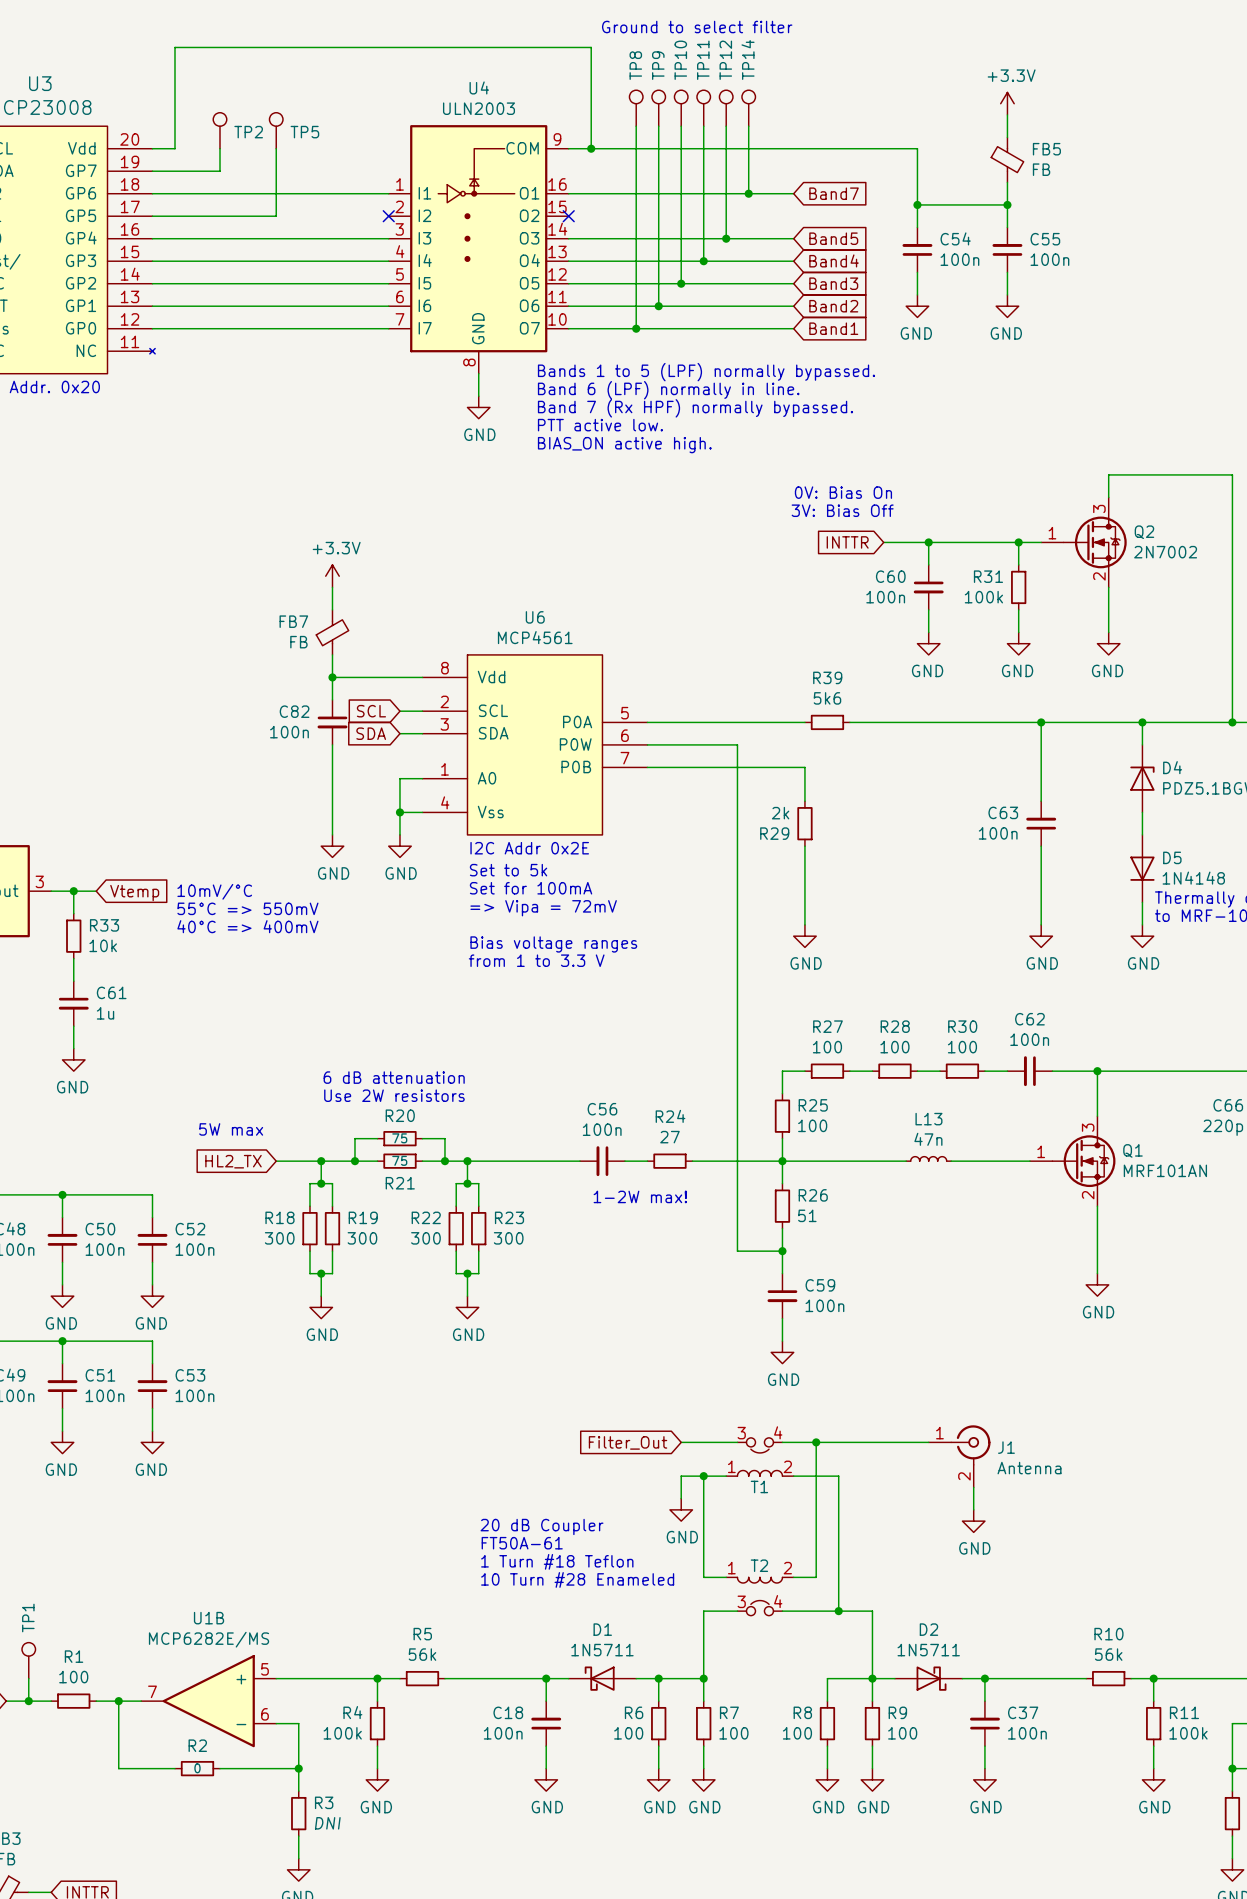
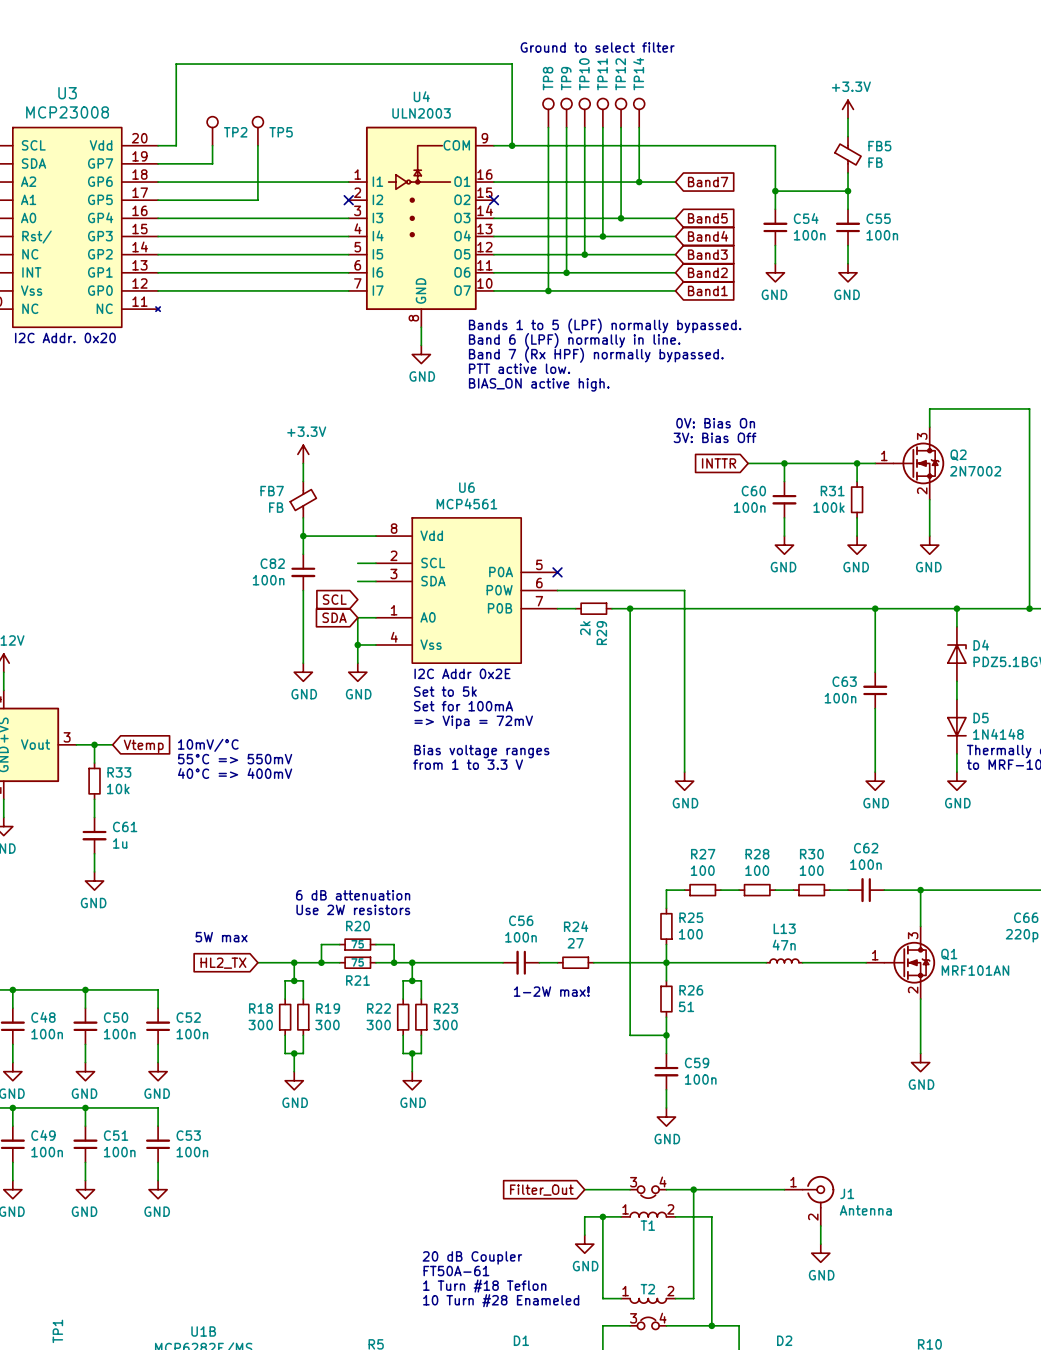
wire: none -> (303, 463) (303, 481)
power symbol position: +3.3V (332, 576) -> +3.3V (303, 454)
FB7 position: (332, 632) -> (303, 499)
wire: (332, 677) (422, 677) -> (303, 536) (375, 536)
junction position: (332, 677) -> (303, 536)
no-connect mark: none -> (557, 572)
wire: none -> (357, 581) (375, 581)
wire: (399, 711) (422, 711) -> (357, 563) (375, 563)
C82 position: (332, 722) -> (303, 572)
wire: (669, 722) (714, 722) -> (684, 608) (720, 608)
junction: none -> (630, 608)
R39: 5k6 (827, 722) -> none
U6 position: (534, 744) -> (466, 590)
wire: (647, 744) (737, 744) -> (630, 608) (630, 626)
wire: (647, 767) (804, 767) -> (557, 590) (684, 590) (684, 645)
wire: (399, 778) (422, 778) -> (357, 654) (357, 617)
wire: (332, 789) (332, 834) -> none
wire: (399, 789) (399, 834) -> none
power symbol: none -> GND (303, 672)
power symbol: none -> GND (357, 672)
wire: none -> (684, 672) (684, 708)
wire: (399, 812) (422, 812) -> (357, 645) (375, 645)
junction position: (399, 812) -> (357, 645)
R29 value position: 2k (780, 813) -> 2k (585, 628)
R29 rotation: 0° (804, 823) -> 90° clockwise (593, 608)
R29 position: (804, 823) -> (593, 608)
R29 name position: R29 (774, 833) -> R29 (601, 633)
power symbol: GND (332, 846) -> none
power symbol: GND (399, 846) -> none
text position: I2C Addr 0x2E (529, 848) -> I2C Addr 0x2E (462, 673)
text position: Set to 5k (508, 870) -> Set to 5k (445, 691)
text position: Set for 100mA (531, 888) -> Set for 100mA (463, 706)
text position: => Vipa = 72mV (543, 908) -> => Vipa = 72mV (473, 722)
text position: Bias voltage ranges (553, 944) -> Bias voltage ranges (481, 751)
text position: from 1 to 3.3 V (536, 960) -> from 1 to 3.3 V (468, 764)

